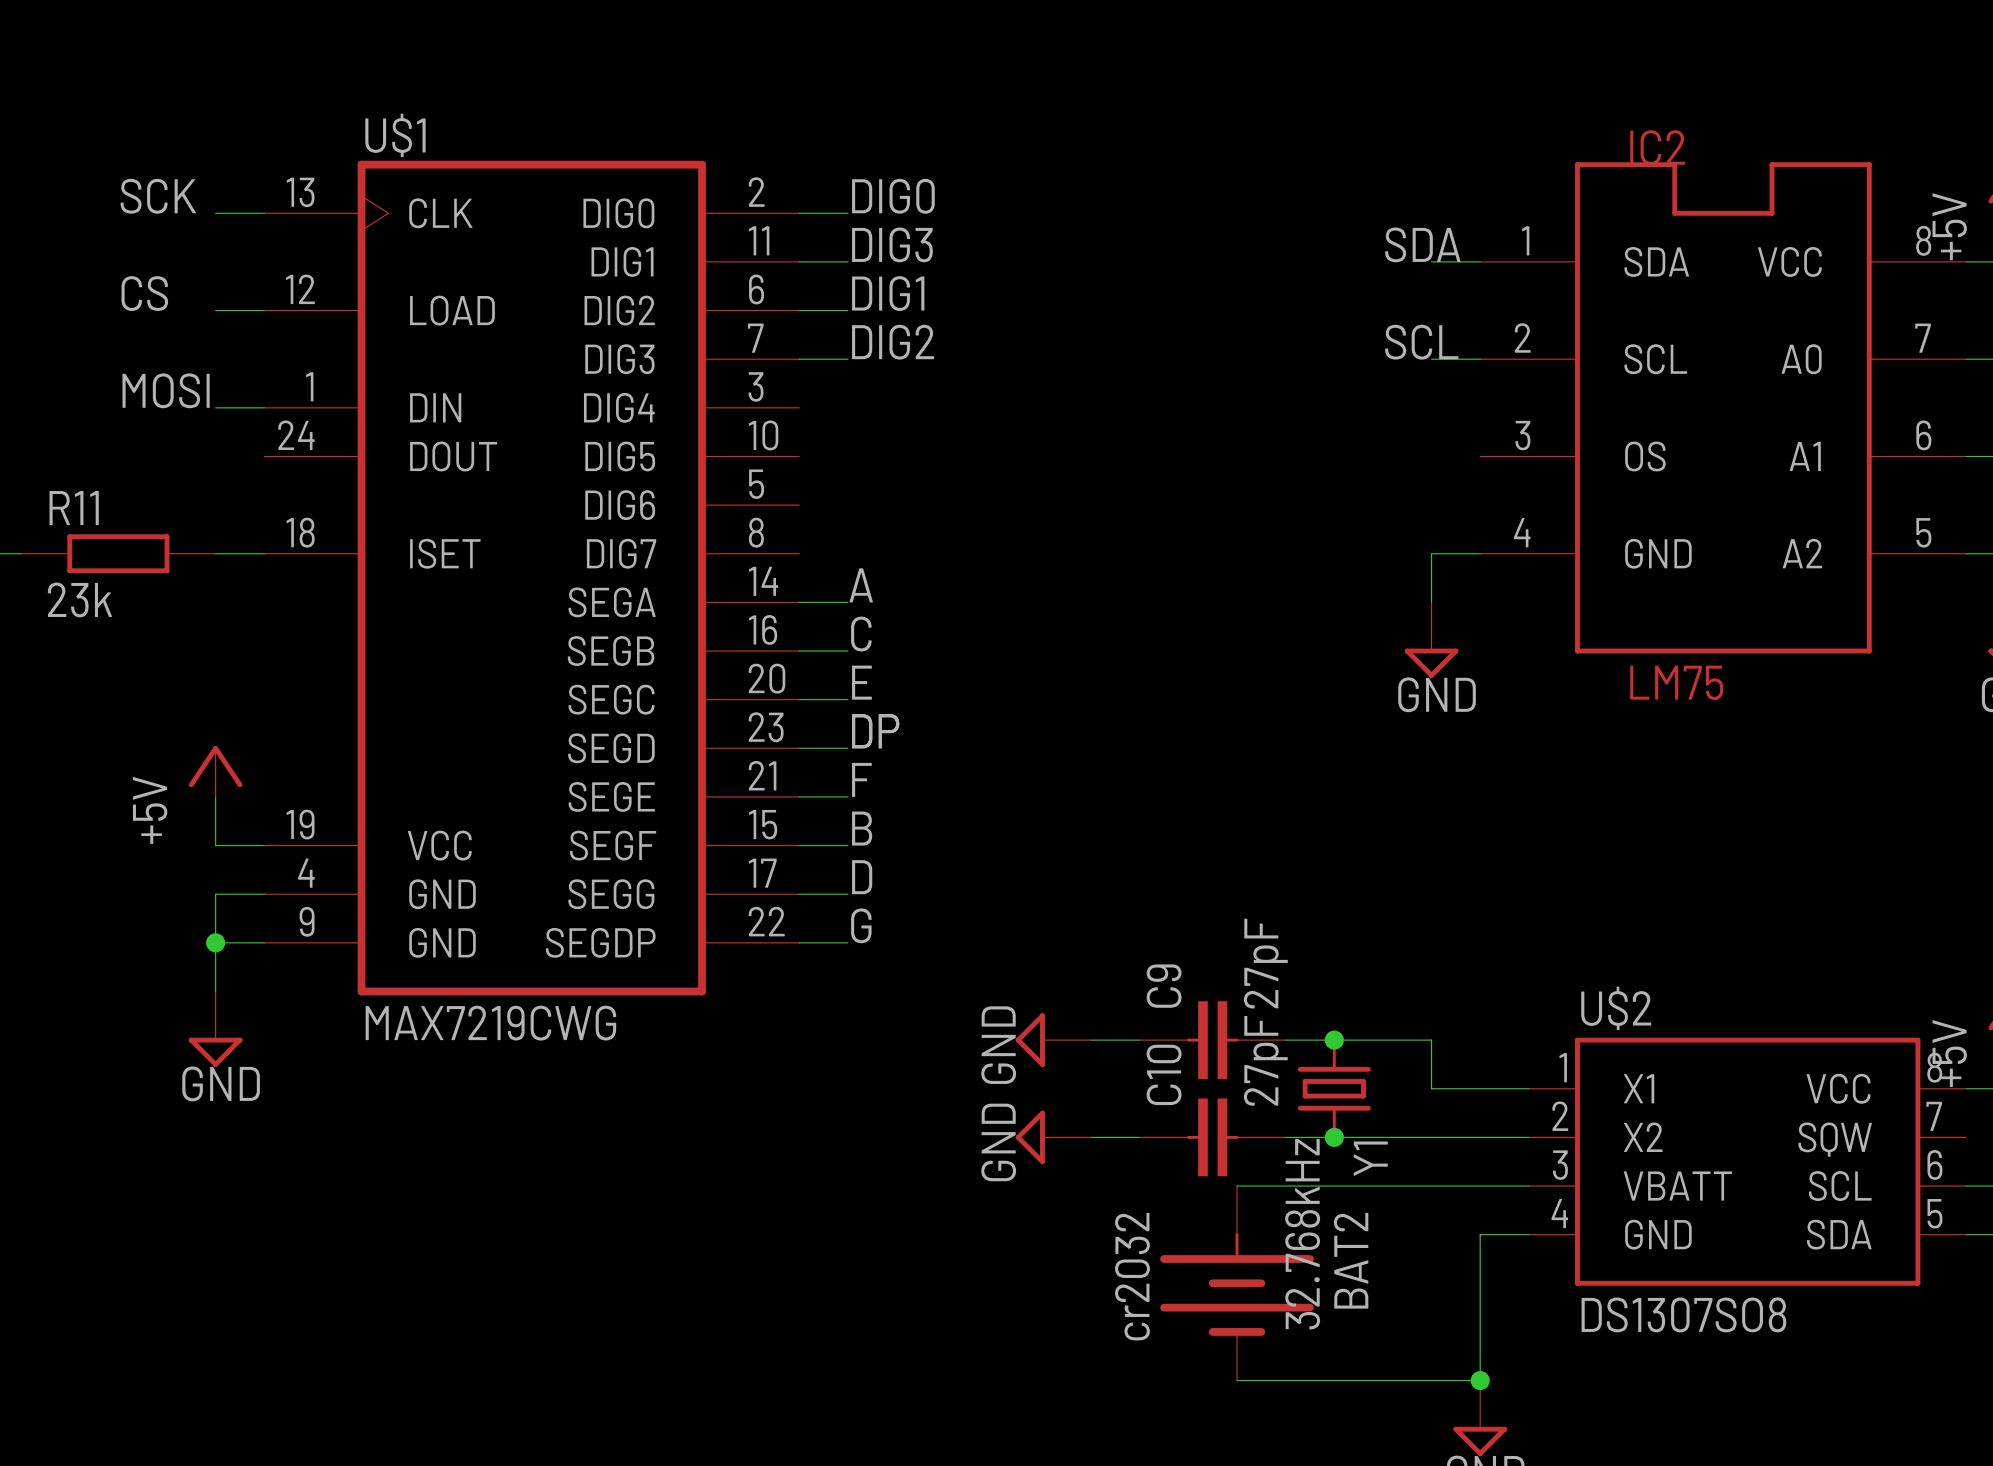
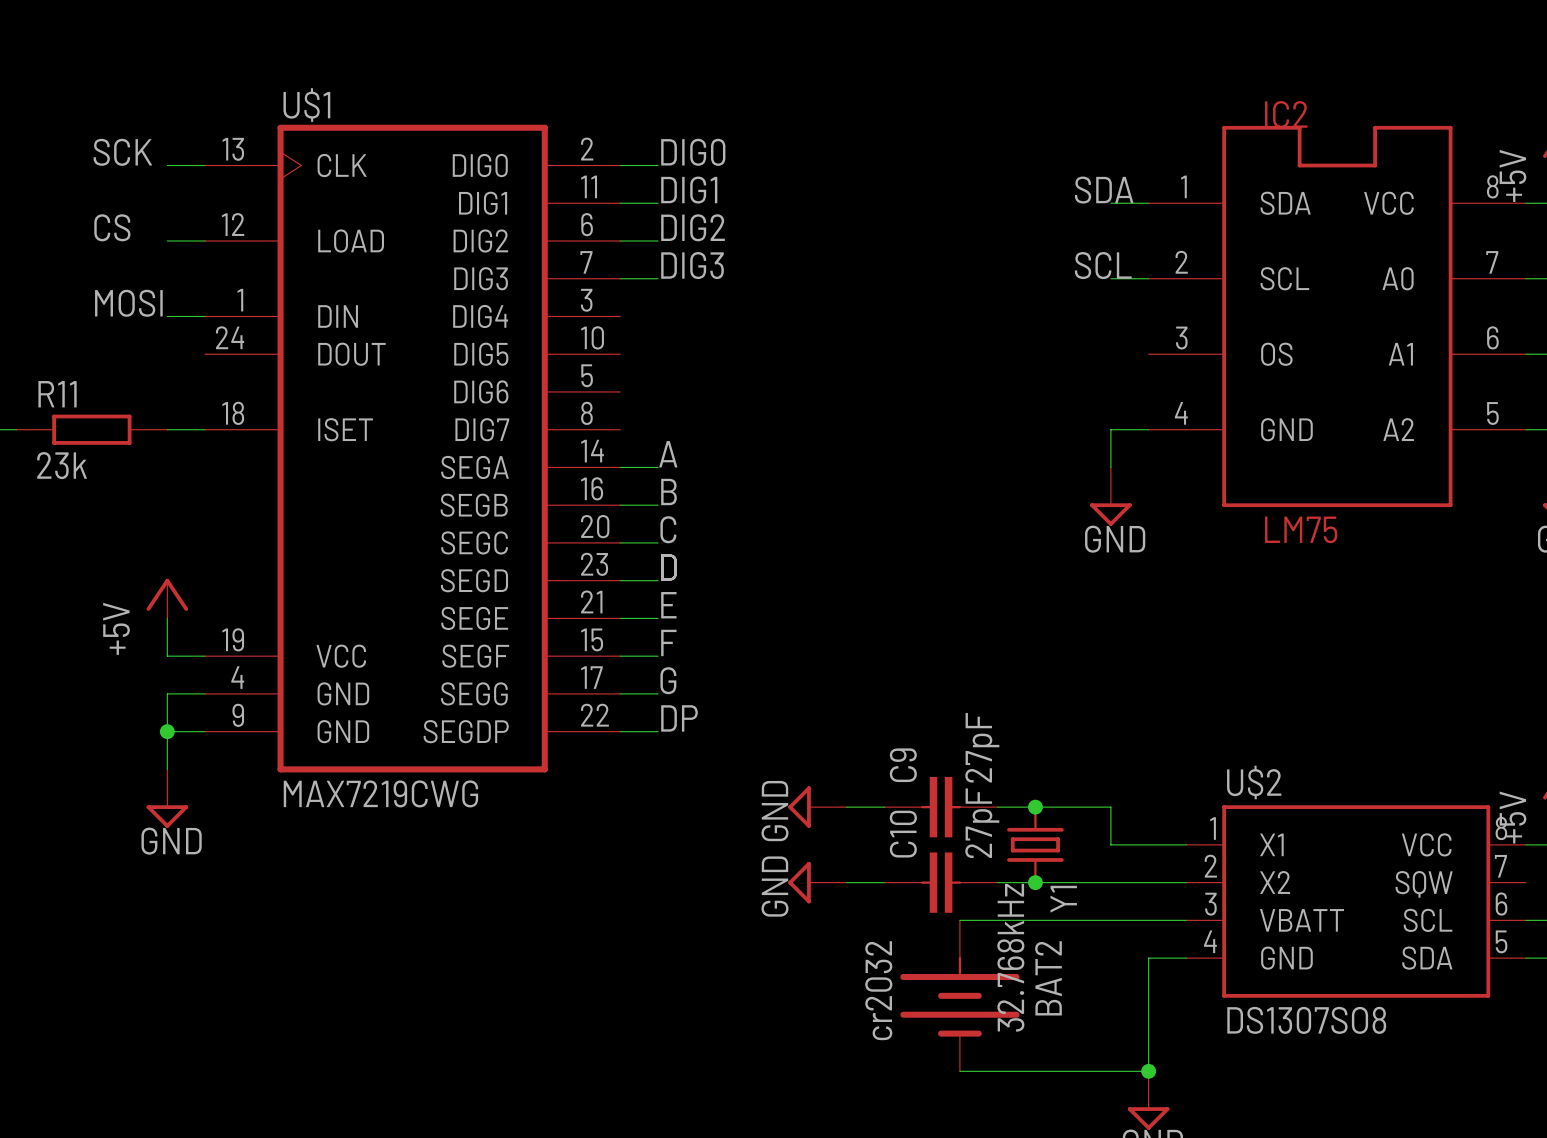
label: DIG3 (892, 244) -> DIG1 (689, 190)
label: DIG1 (888, 293) -> DIG2 (693, 227)
label: DIG2 (893, 342) -> DIG3 (692, 265)
label: C (861, 634) -> B (669, 491)
label: E (861, 682) -> C (668, 529)
label: DP (875, 731) -> D (669, 567)
label: F (861, 779) -> E (668, 605)
label: B (862, 828) -> F (668, 642)
label: D (862, 877) -> G (668, 680)
label: G (861, 925) -> DP (679, 718)

